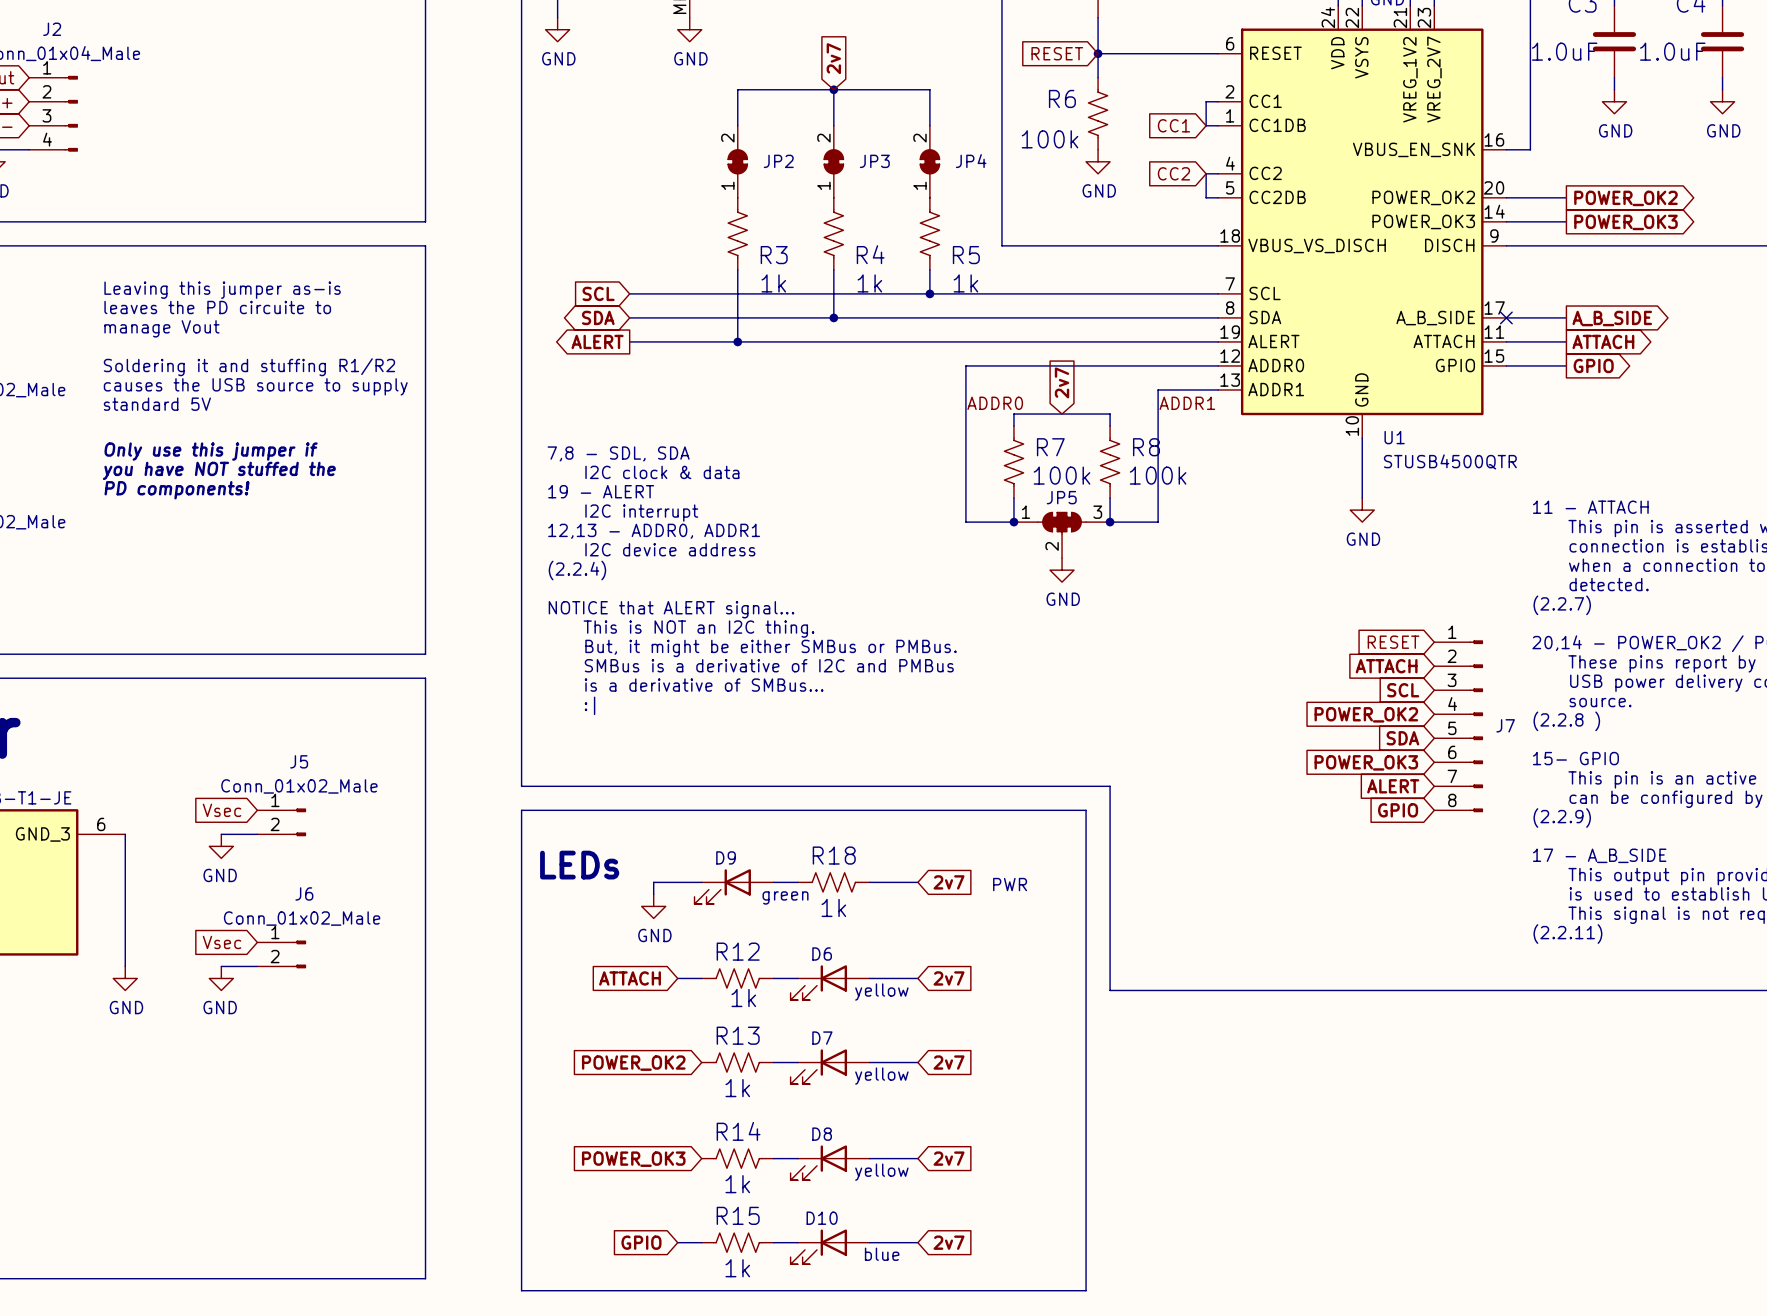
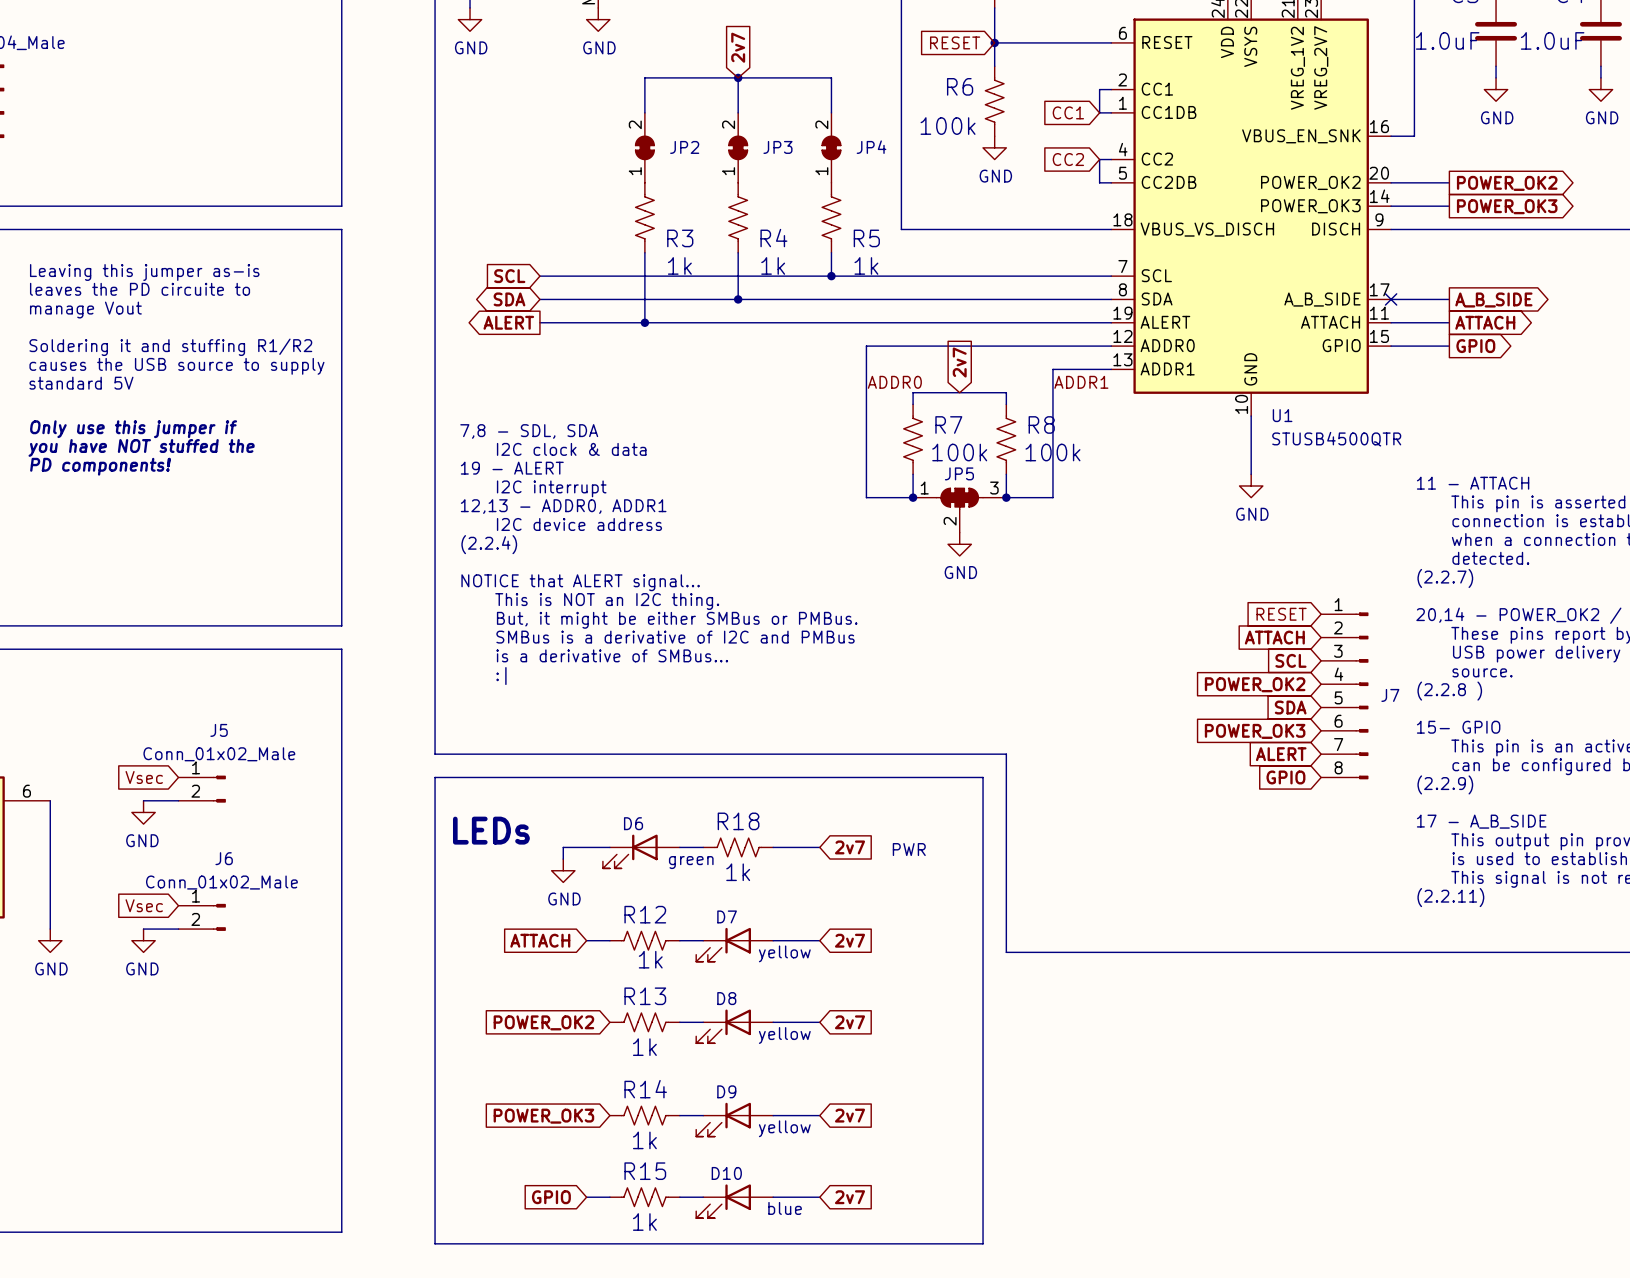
D9 name: D9 (726, 857) -> D6 (633, 823)
D6 name: D6 (822, 954) -> D7 (727, 916)
D7 name: D7 (822, 1038) -> D8 (726, 998)
D8 name: D8 (822, 1134) -> D9 (726, 1091)

